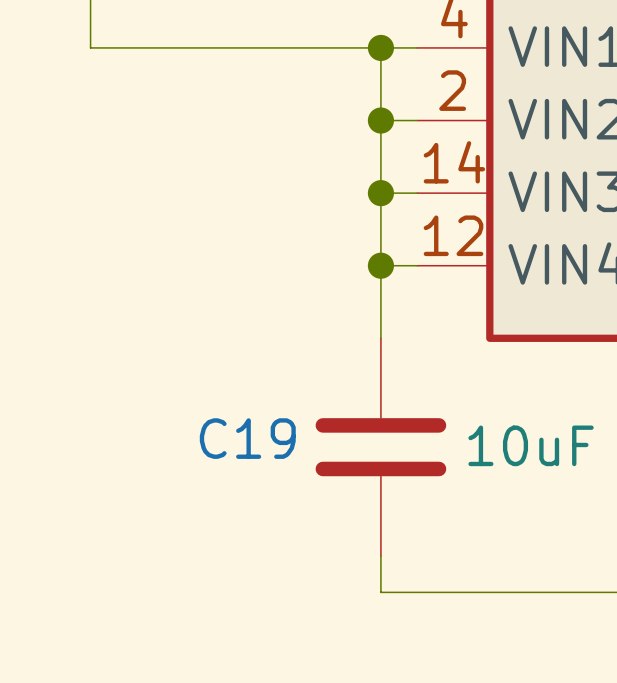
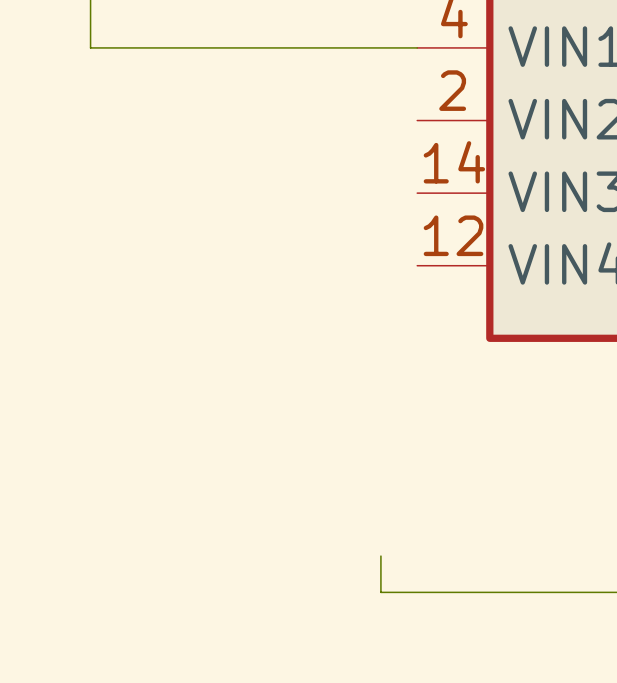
wire: (380, 47) (380, 338) -> none
junction: (380, 47) -> none
wire: (380, 120) (417, 120) -> none
junction: (380, 120) -> none
wire: (380, 193) (417, 193) -> none
junction: (380, 193) -> none
wire: (380, 265) (417, 265) -> none
junction: (380, 265) -> none
C19: 10uF (380, 447) -> none

